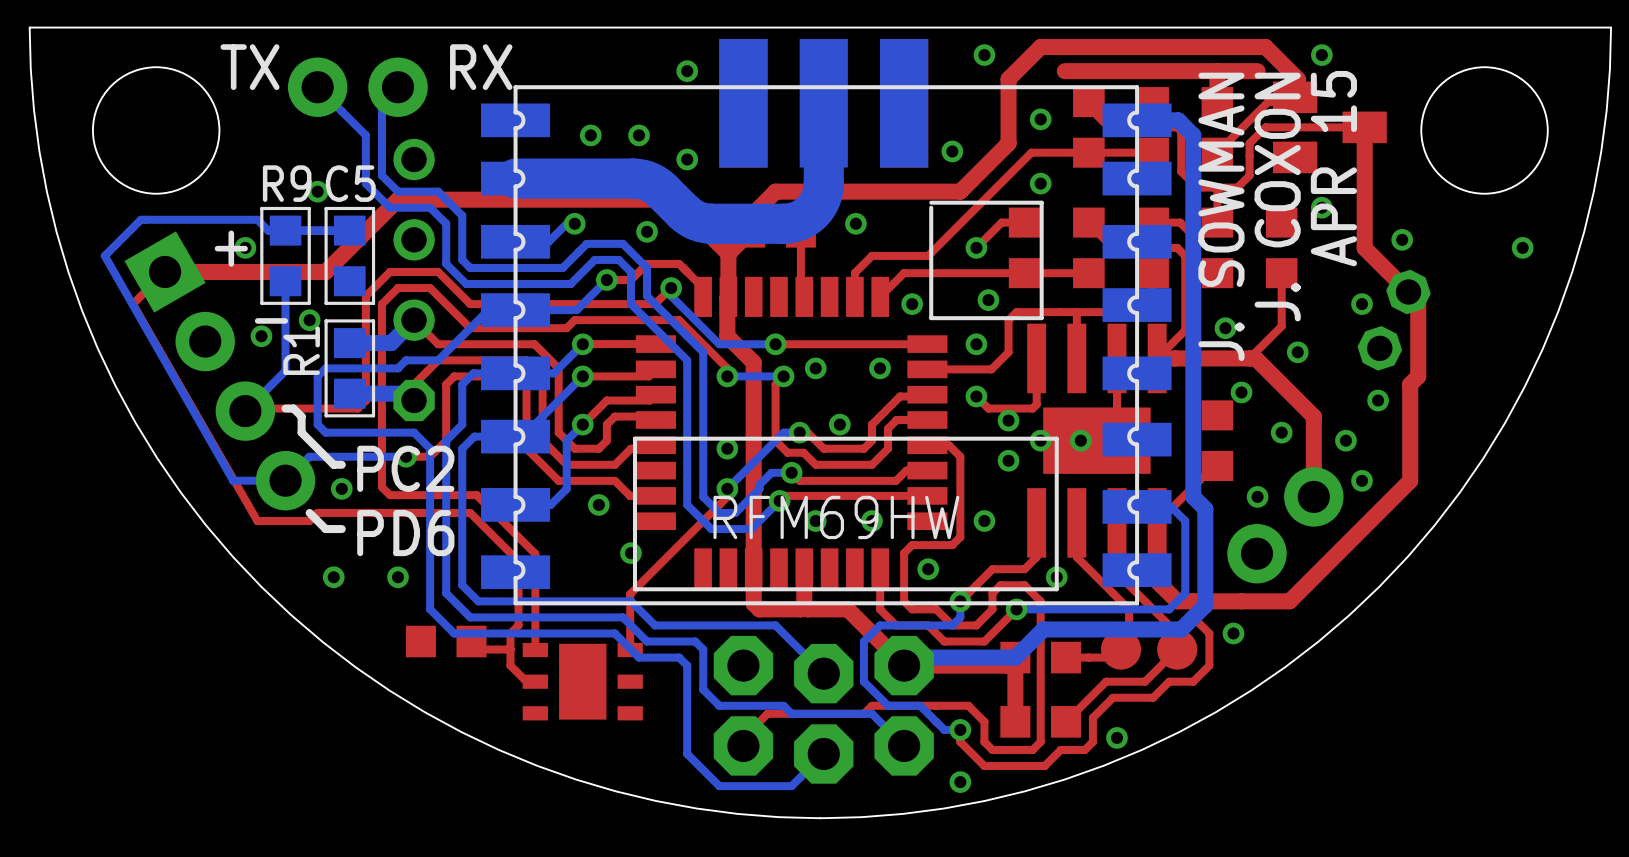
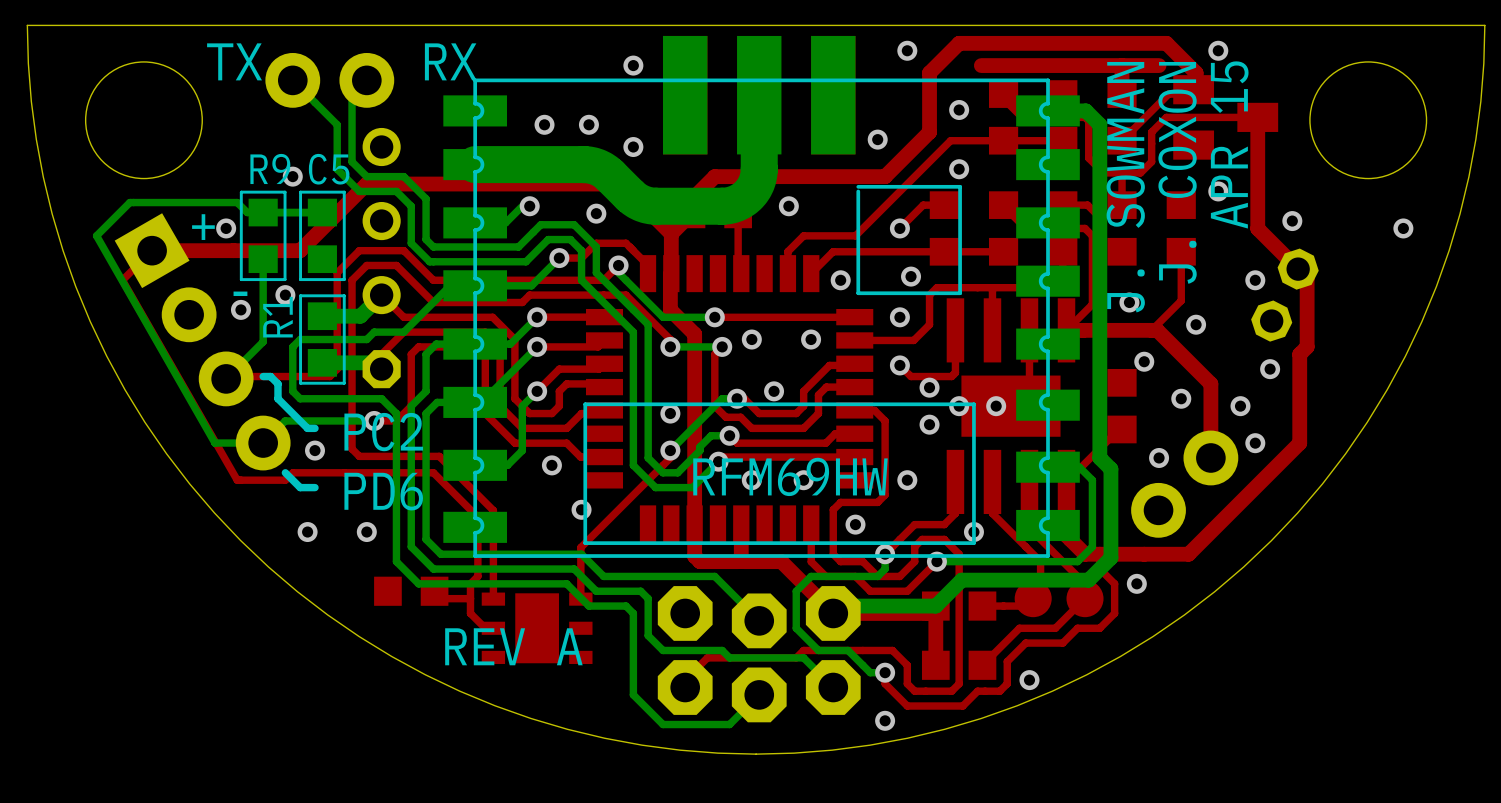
text: none -> REV A (513, 646)

